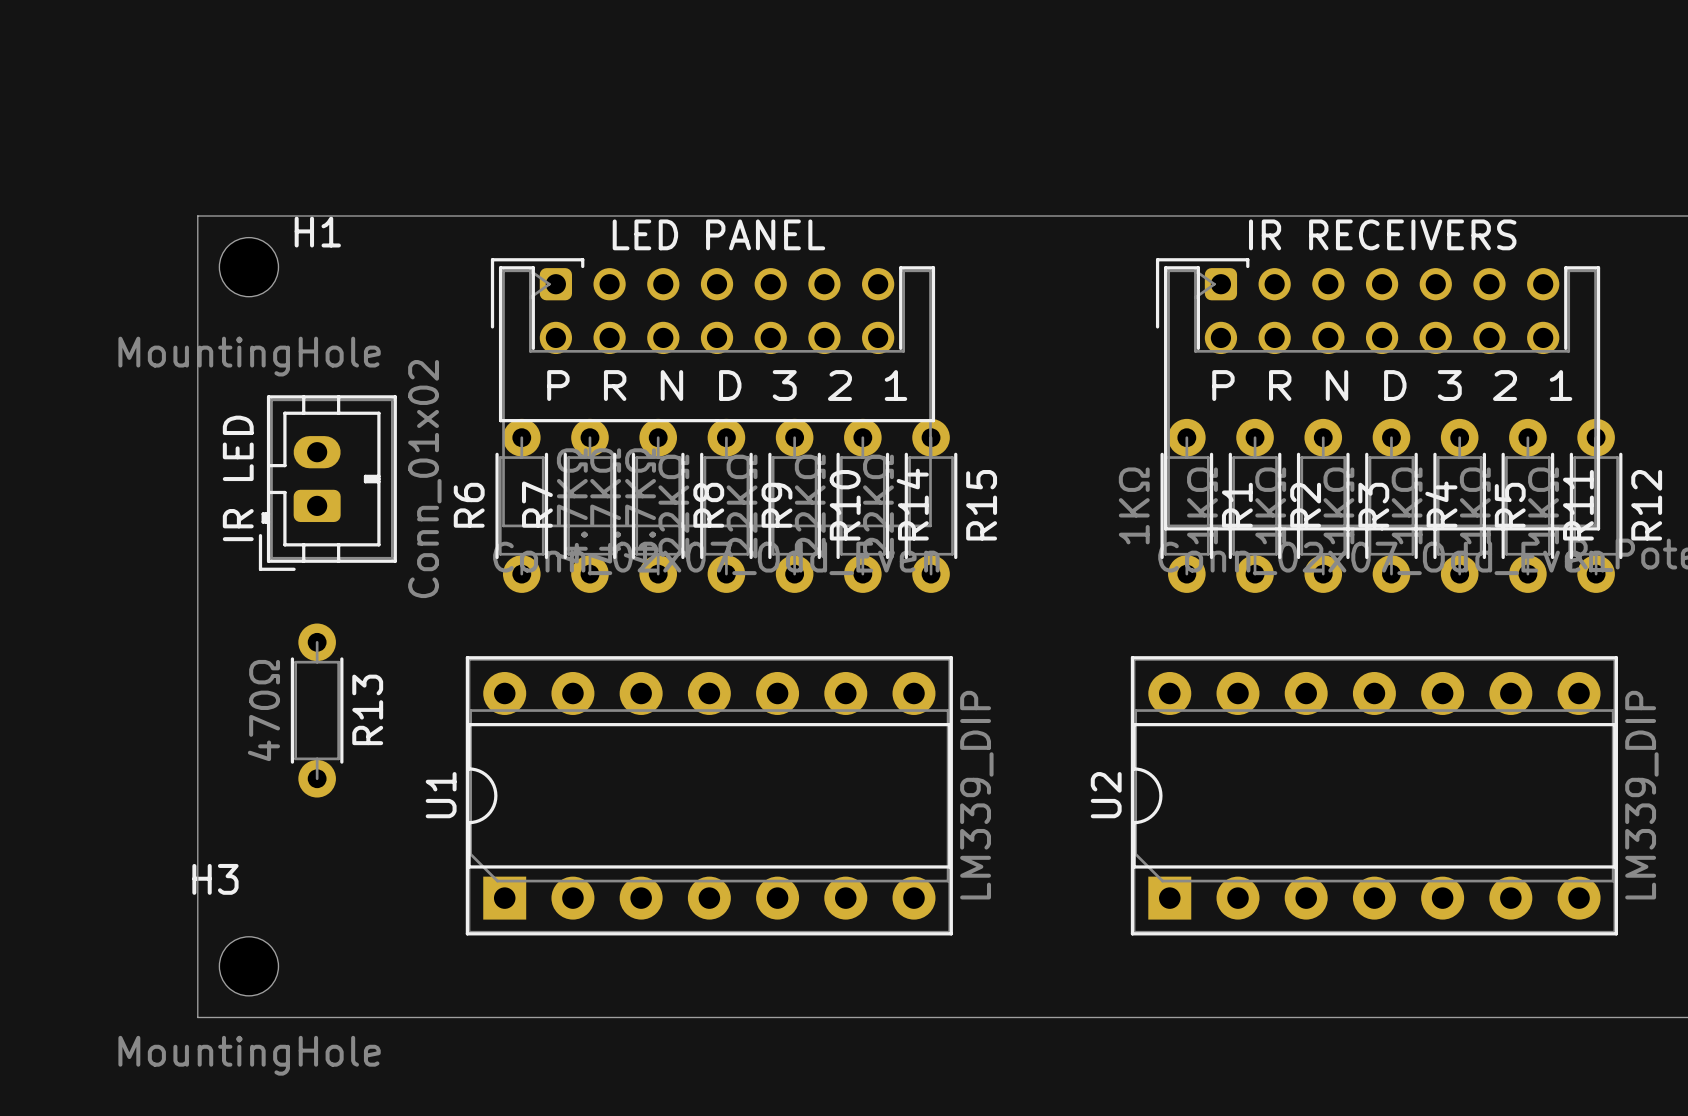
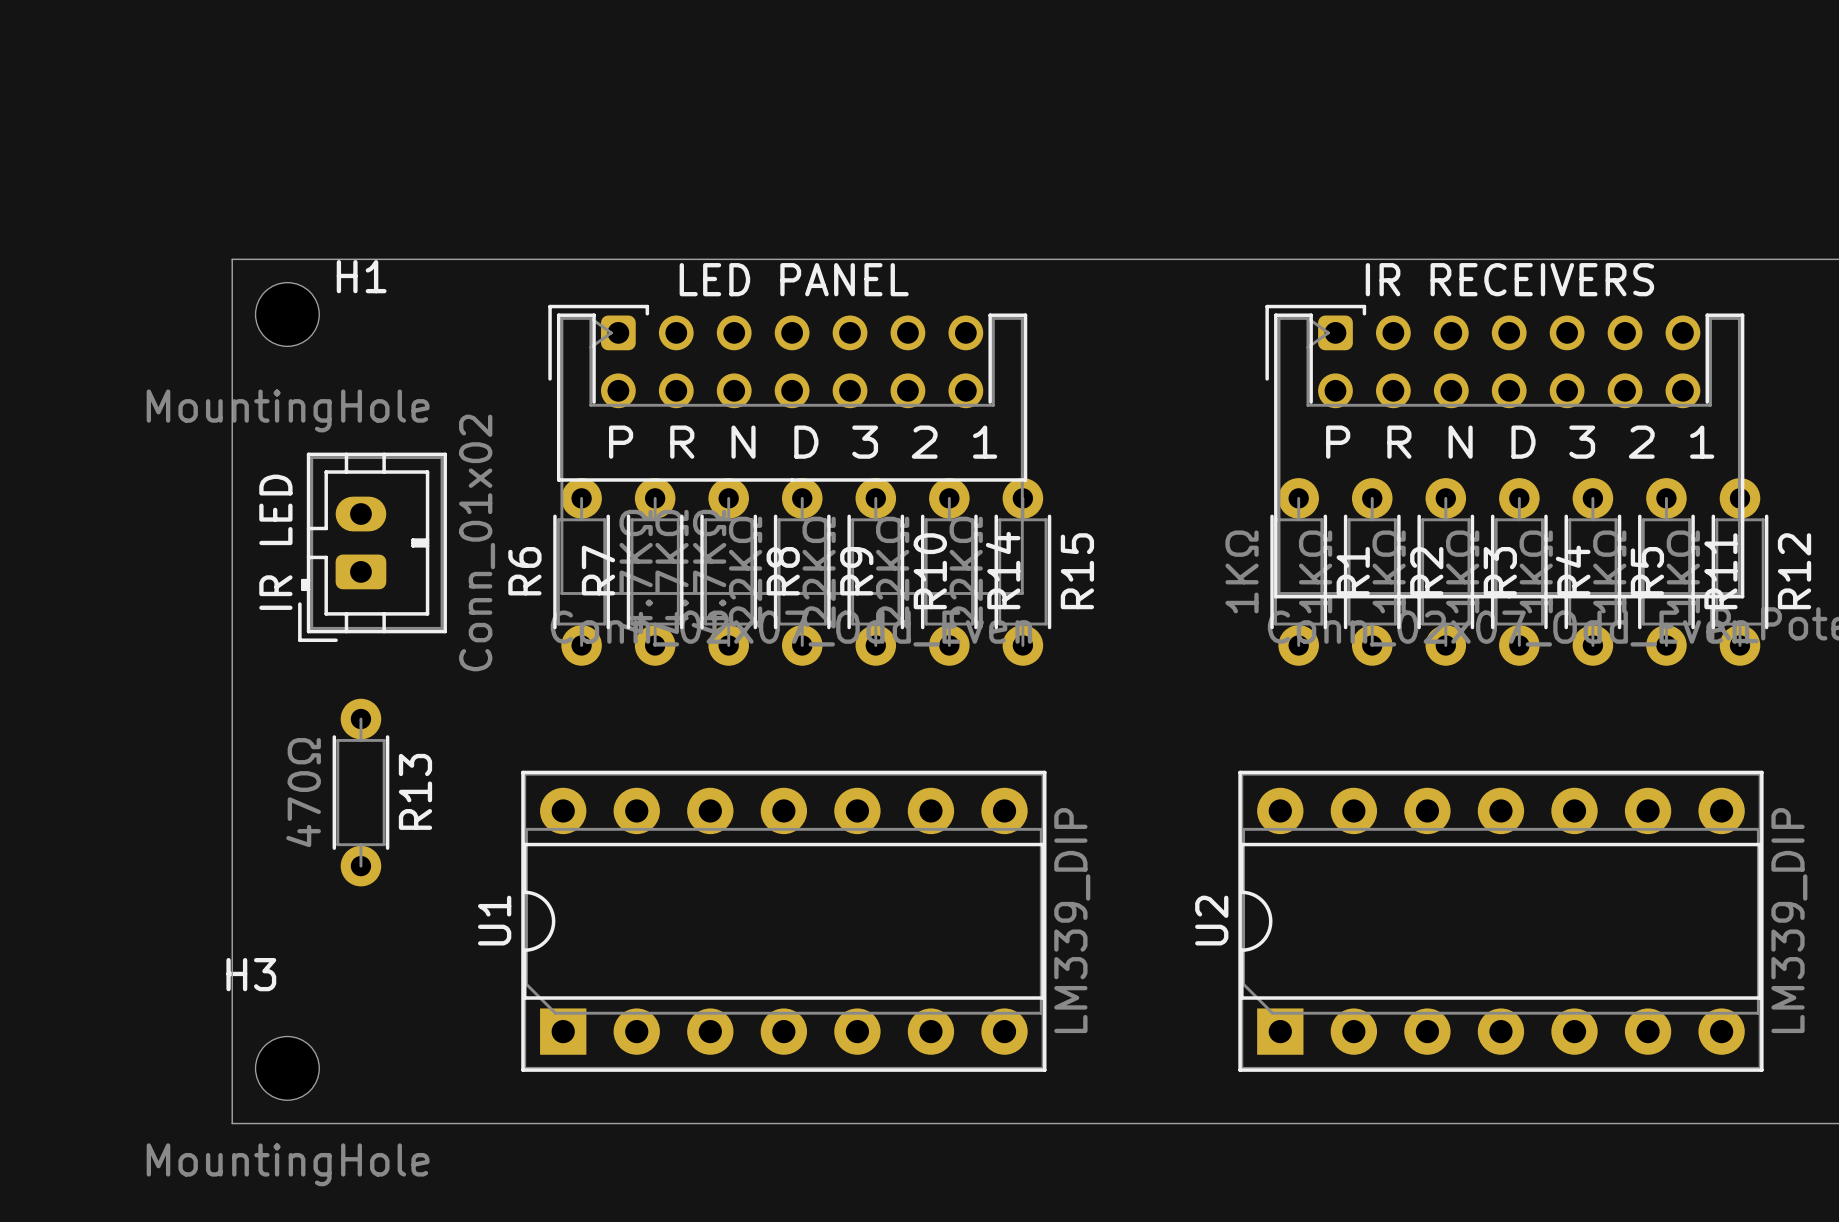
U1 position: (709, 795) -> (783, 921)
U2 position: (1374, 795) -> (1500, 921)

